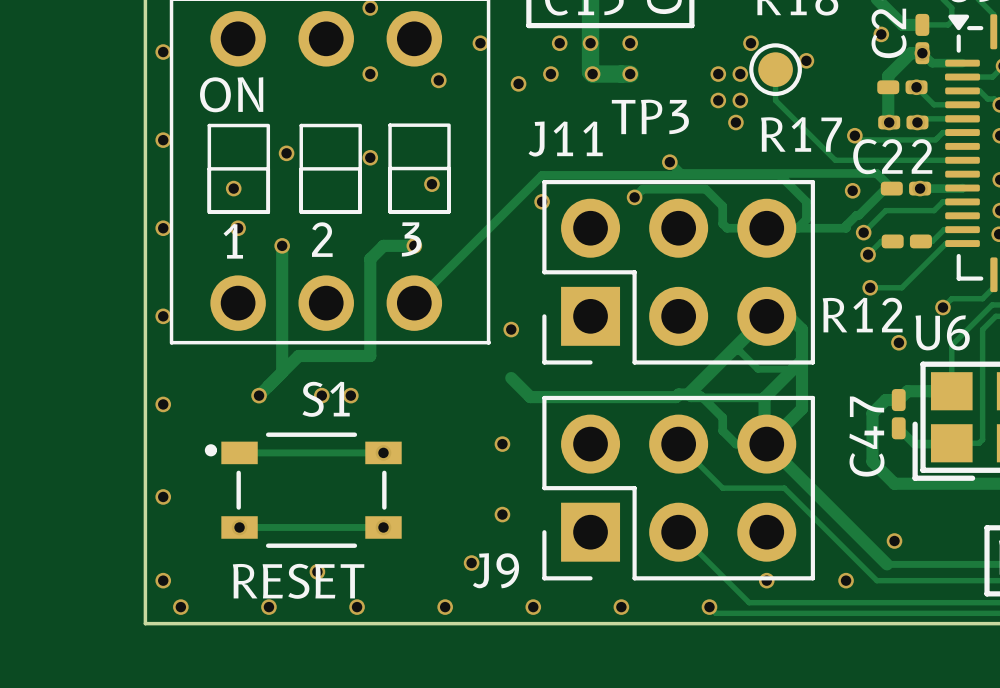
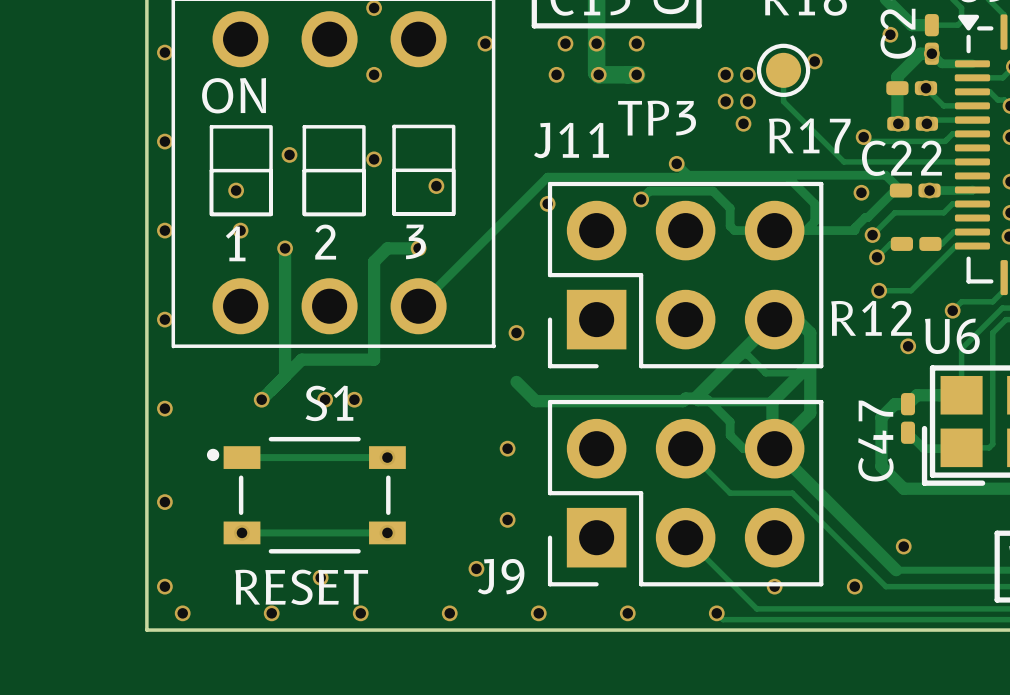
via: (750, 43) -> none
via: (438, 80) -> none
via: (518, 83) -> none

